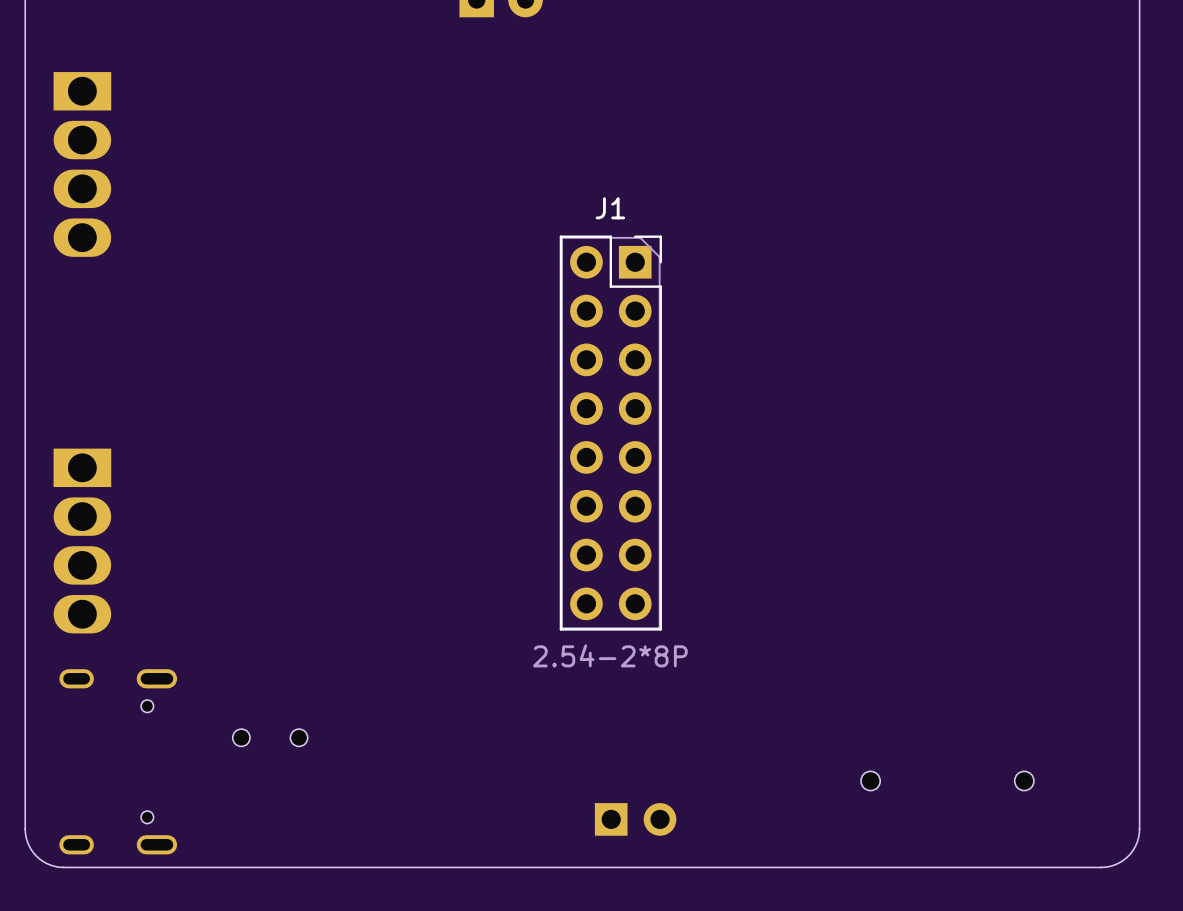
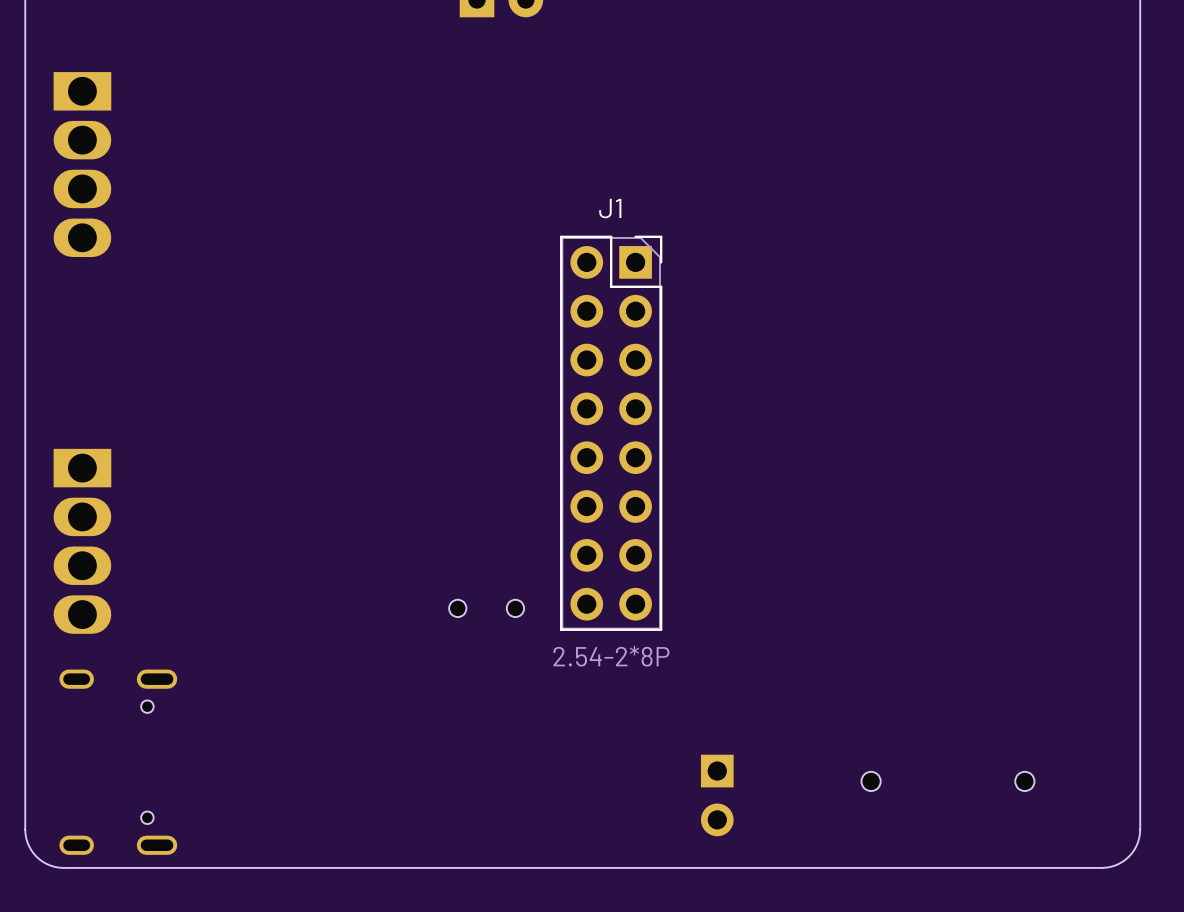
part position: (270, 737) -> (486, 608)
part rotation: 0° (635, 819) -> 90° clockwise (717, 795)
part position: (635, 819) -> (717, 795)

